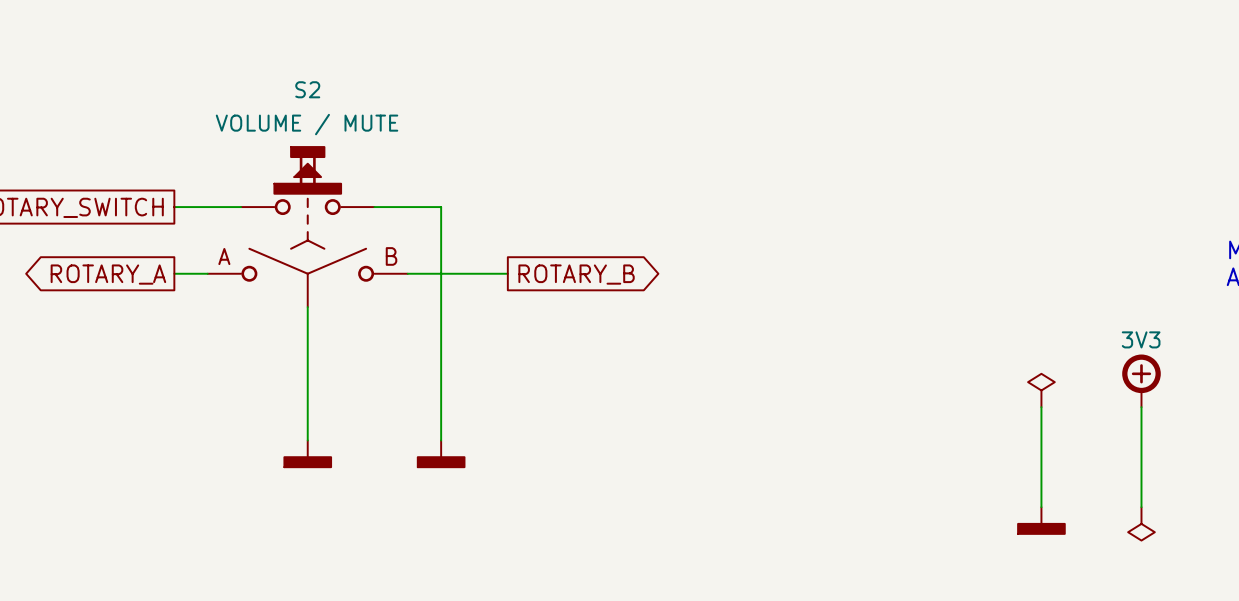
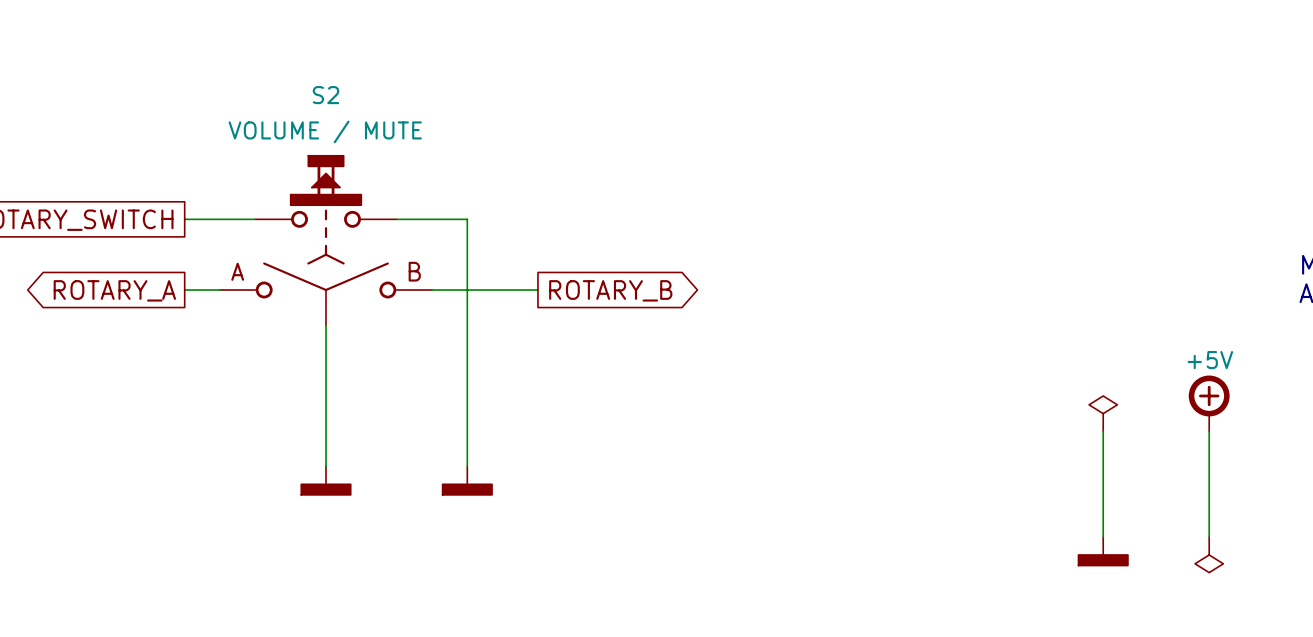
power symbol text: 3V3 (1141, 339) -> +5V (1210, 360)

